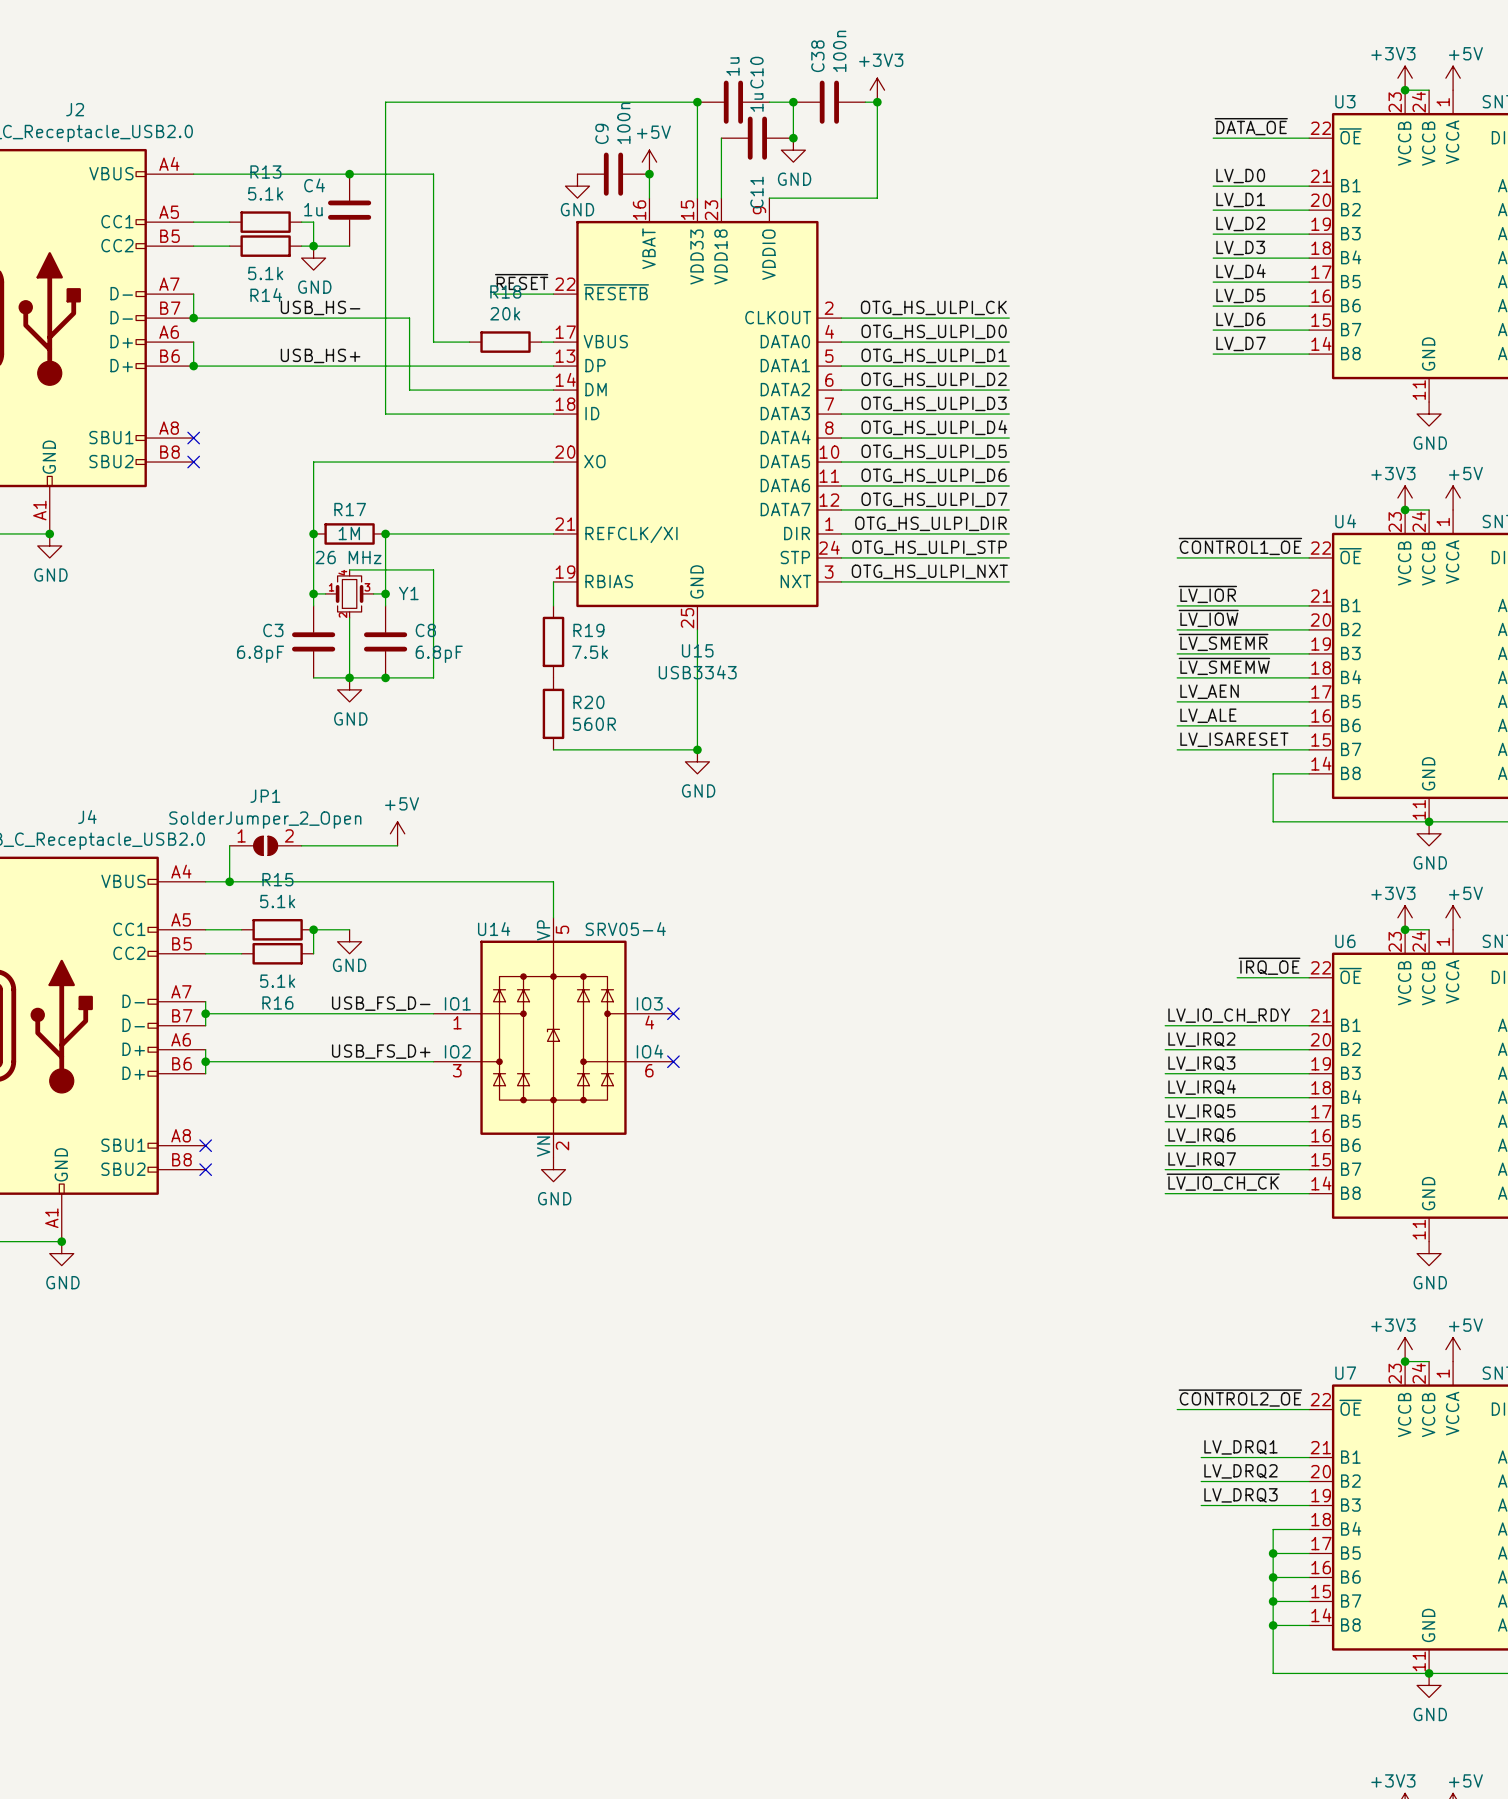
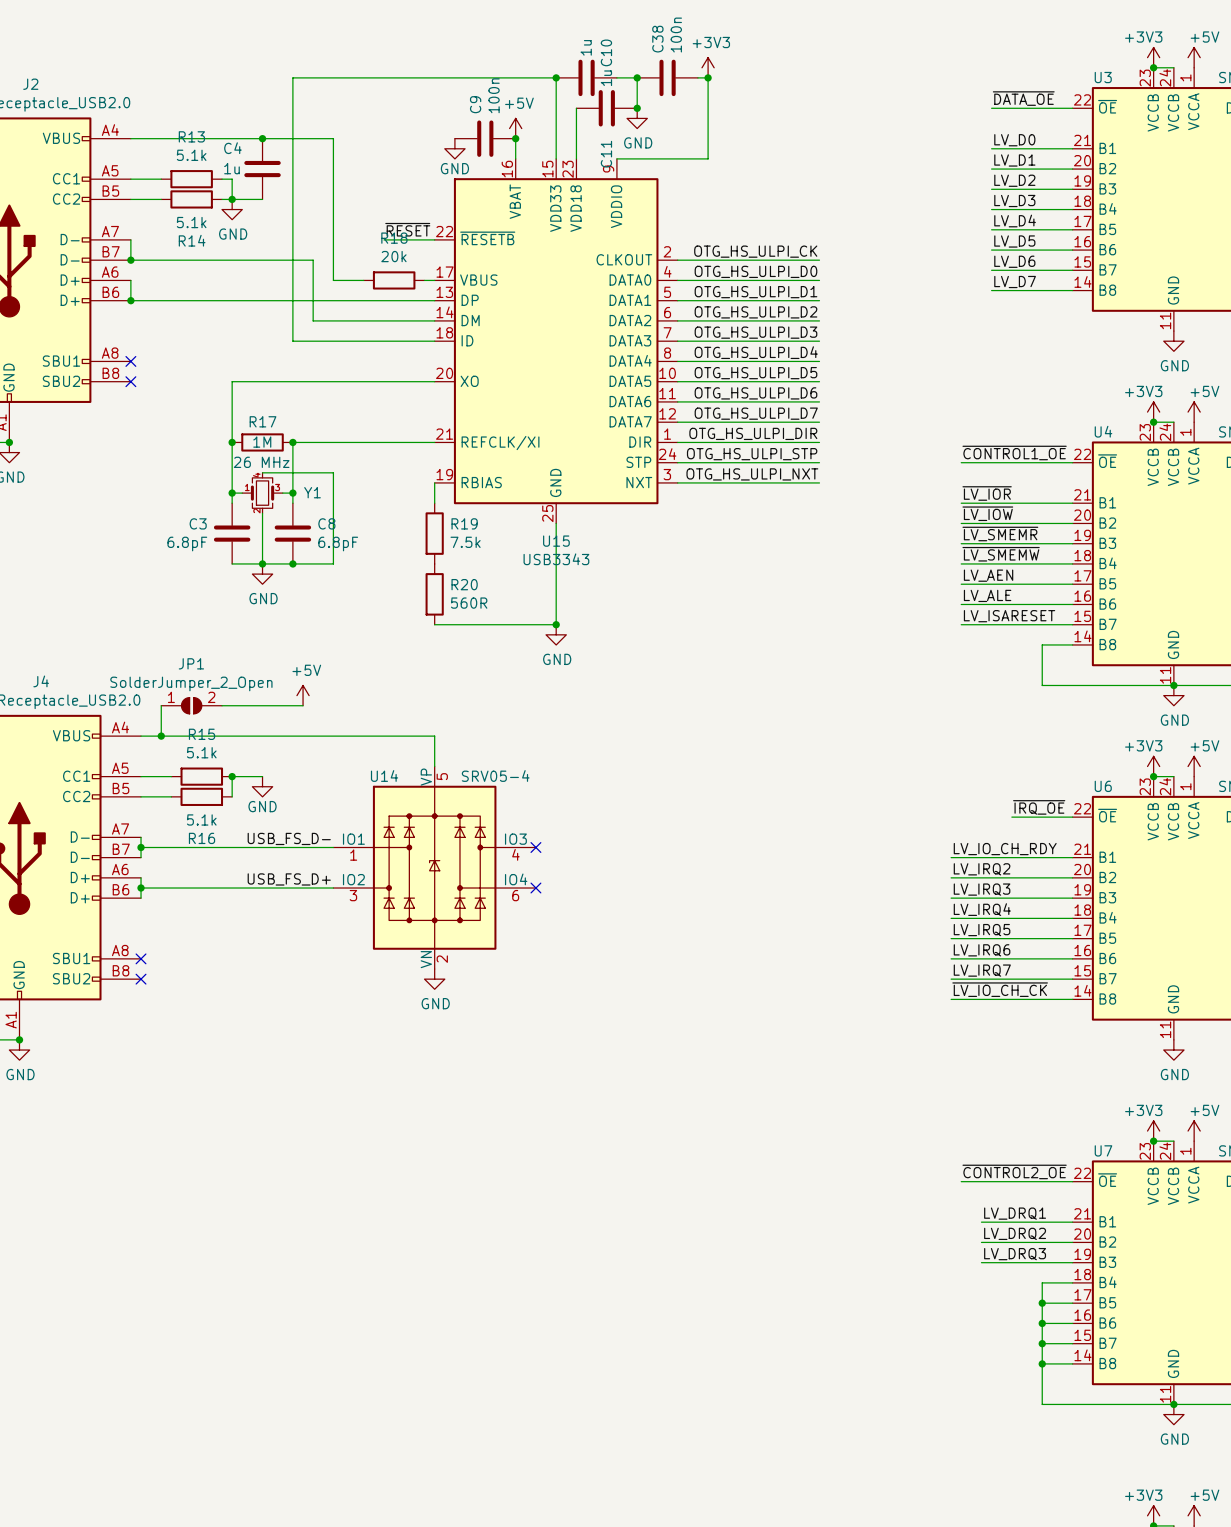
label: USB_HS- (320, 307) -> none
label: USB_HS+ (320, 355) -> none

